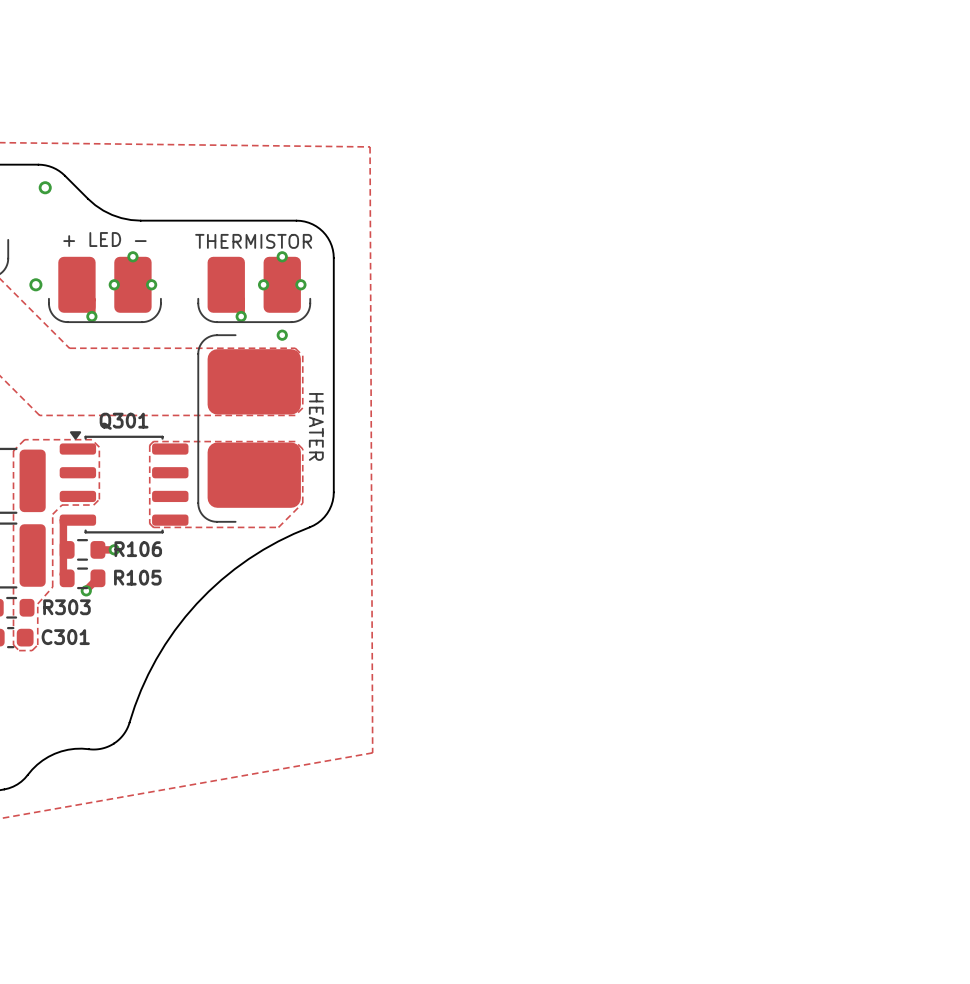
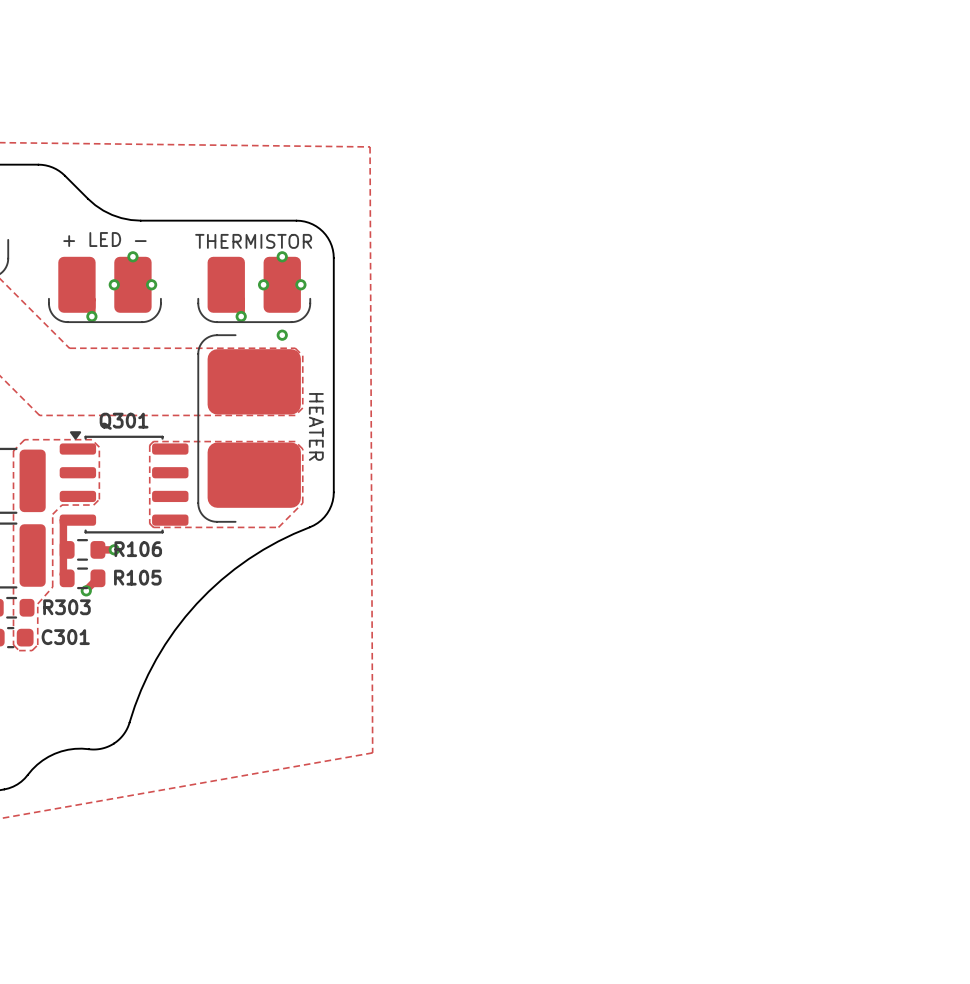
via: (45, 187) -> none
via: (35, 284) -> none

